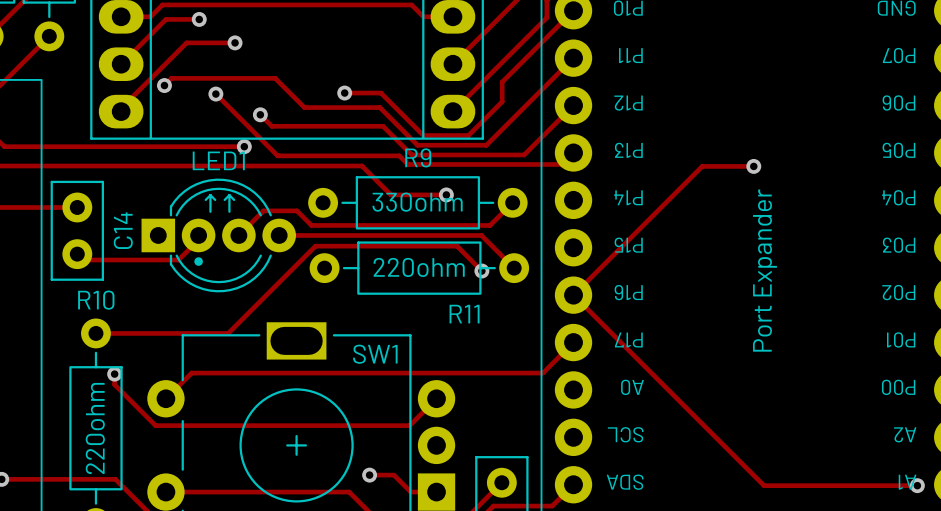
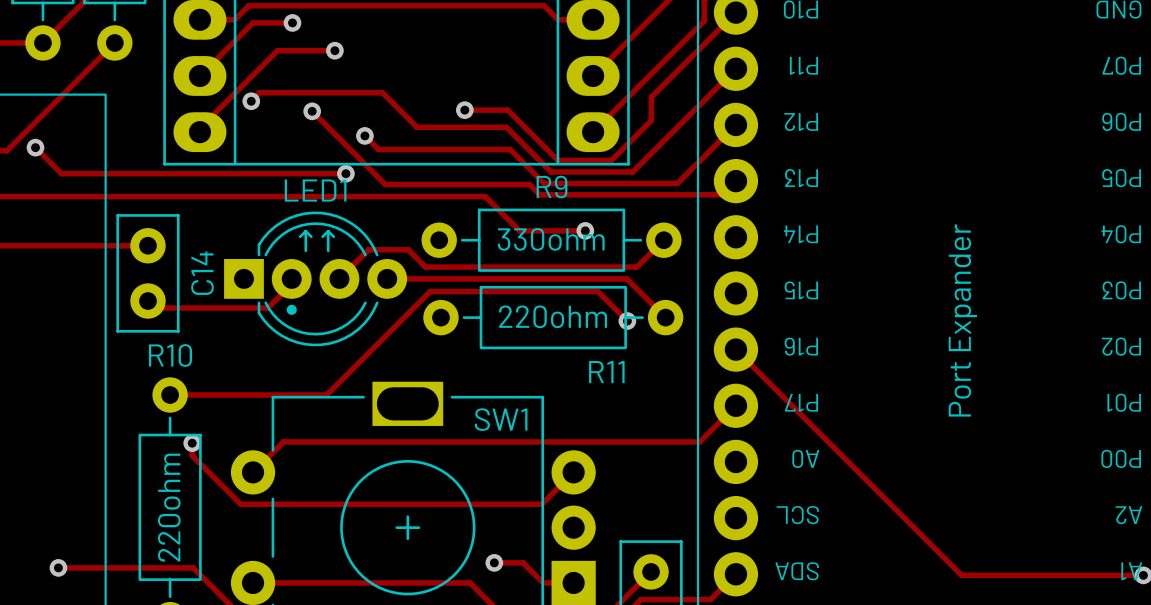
track: (753, 166) (702, 166) (573, 295) -> none
via: (753, 166) -> none

